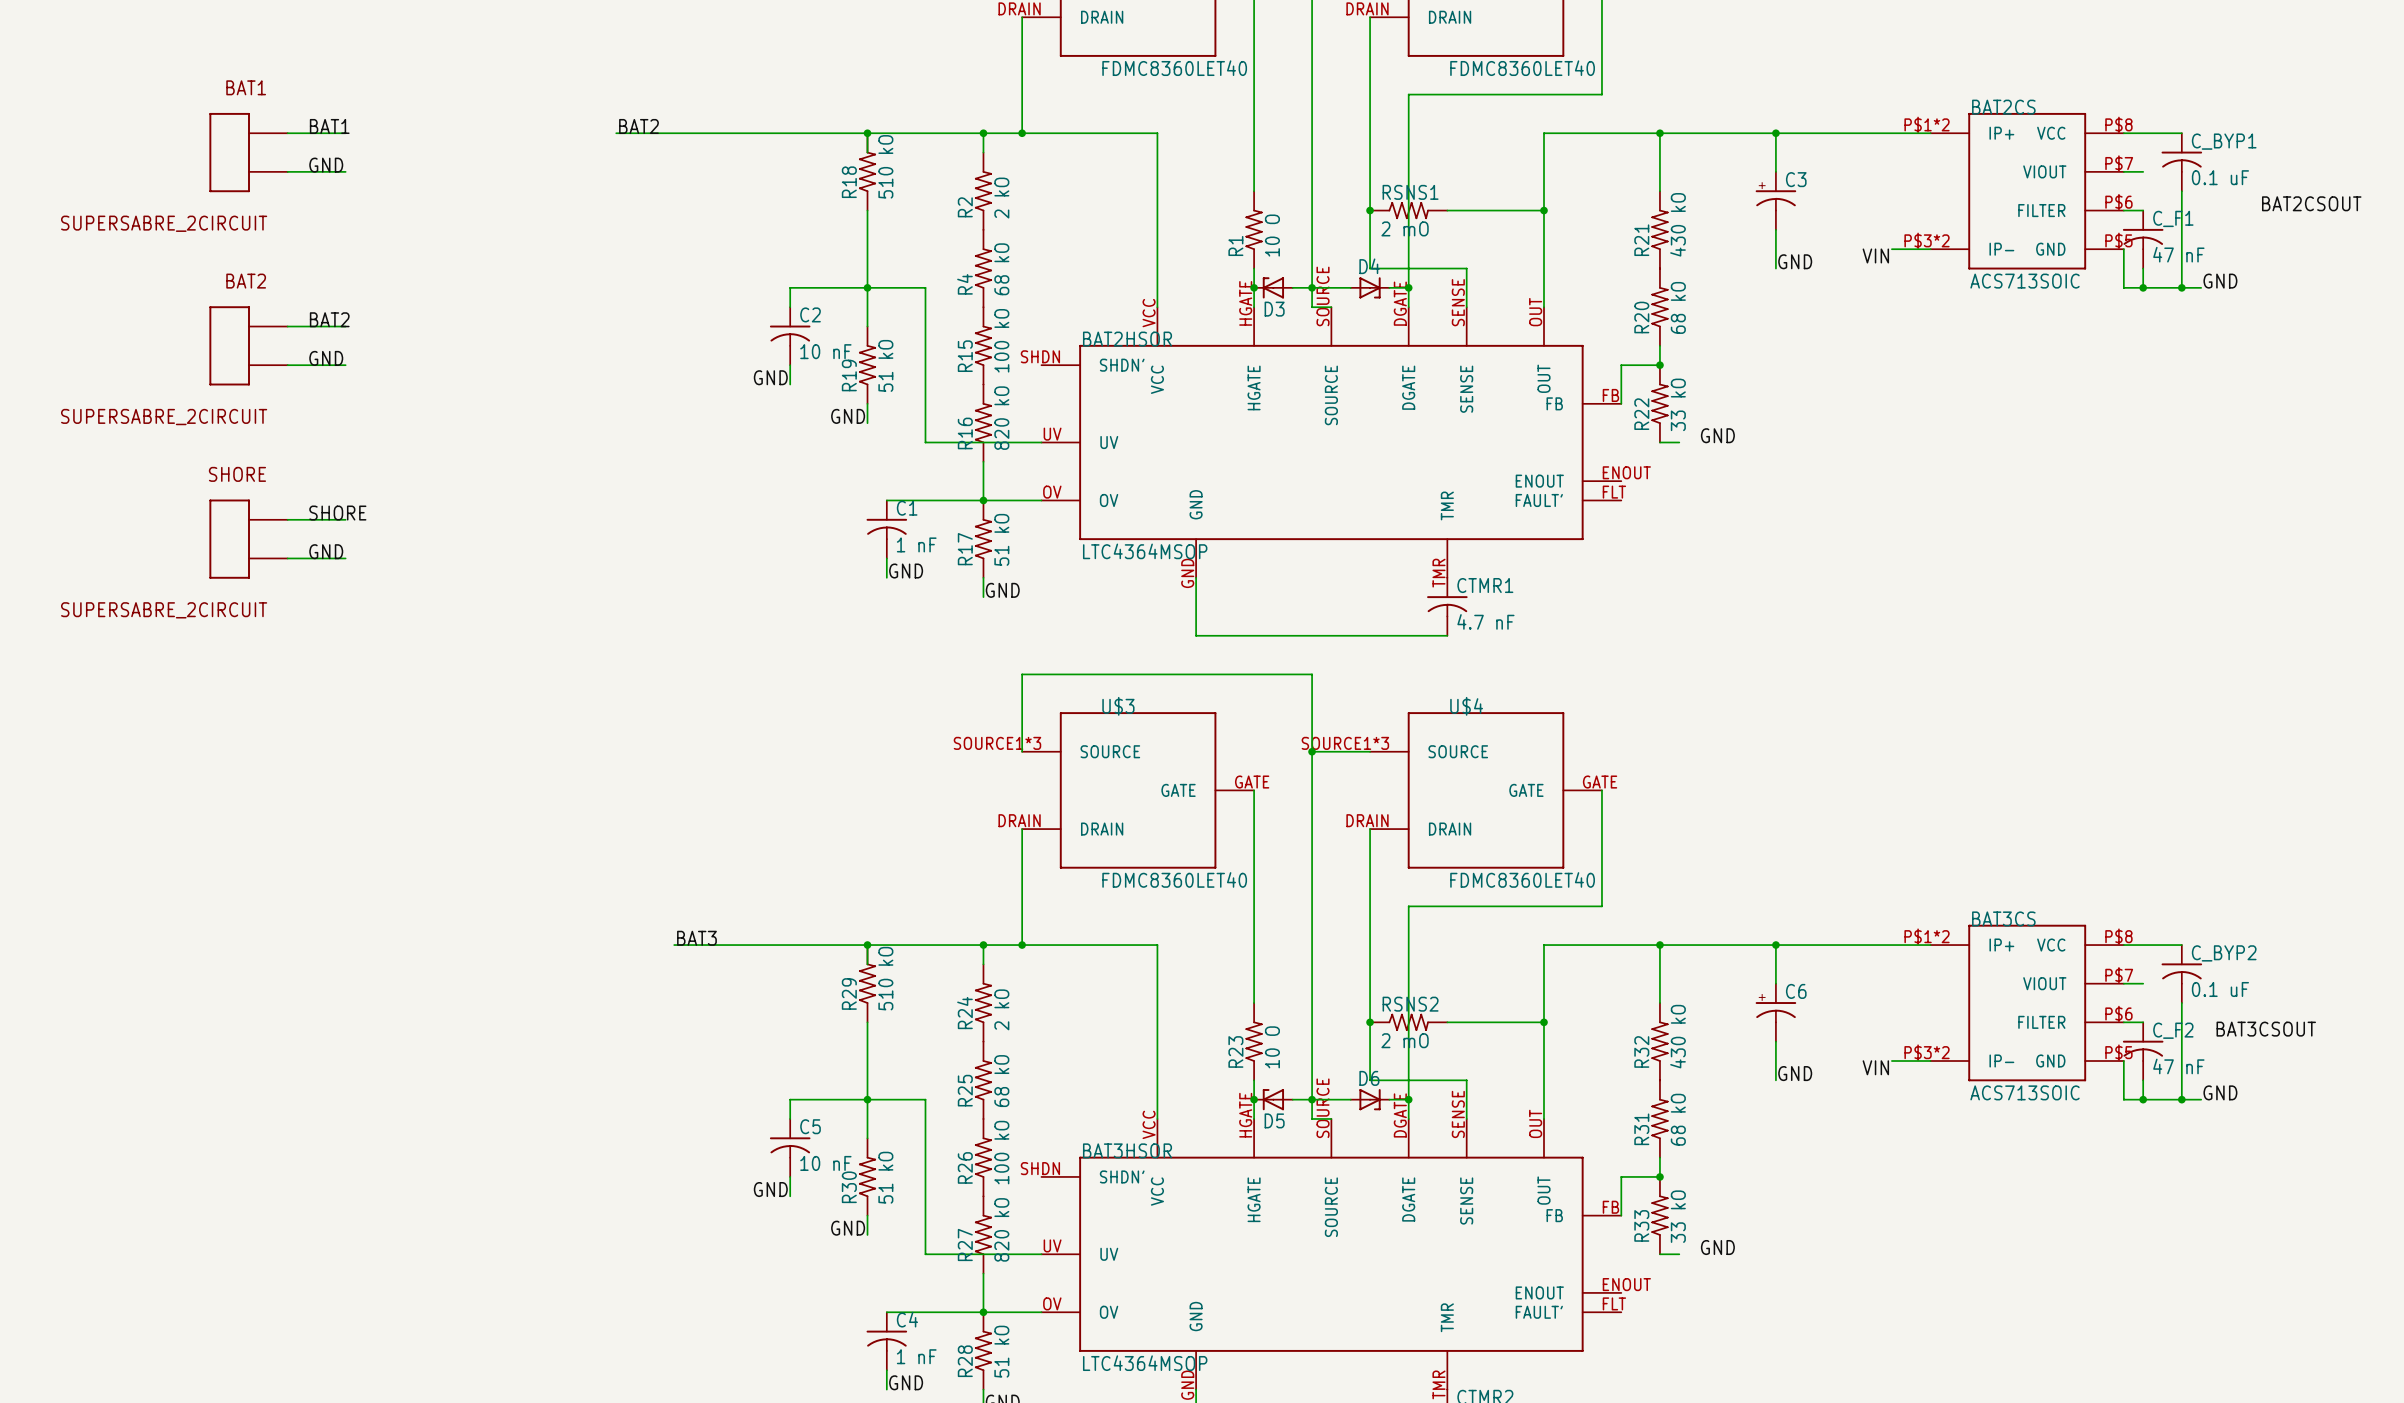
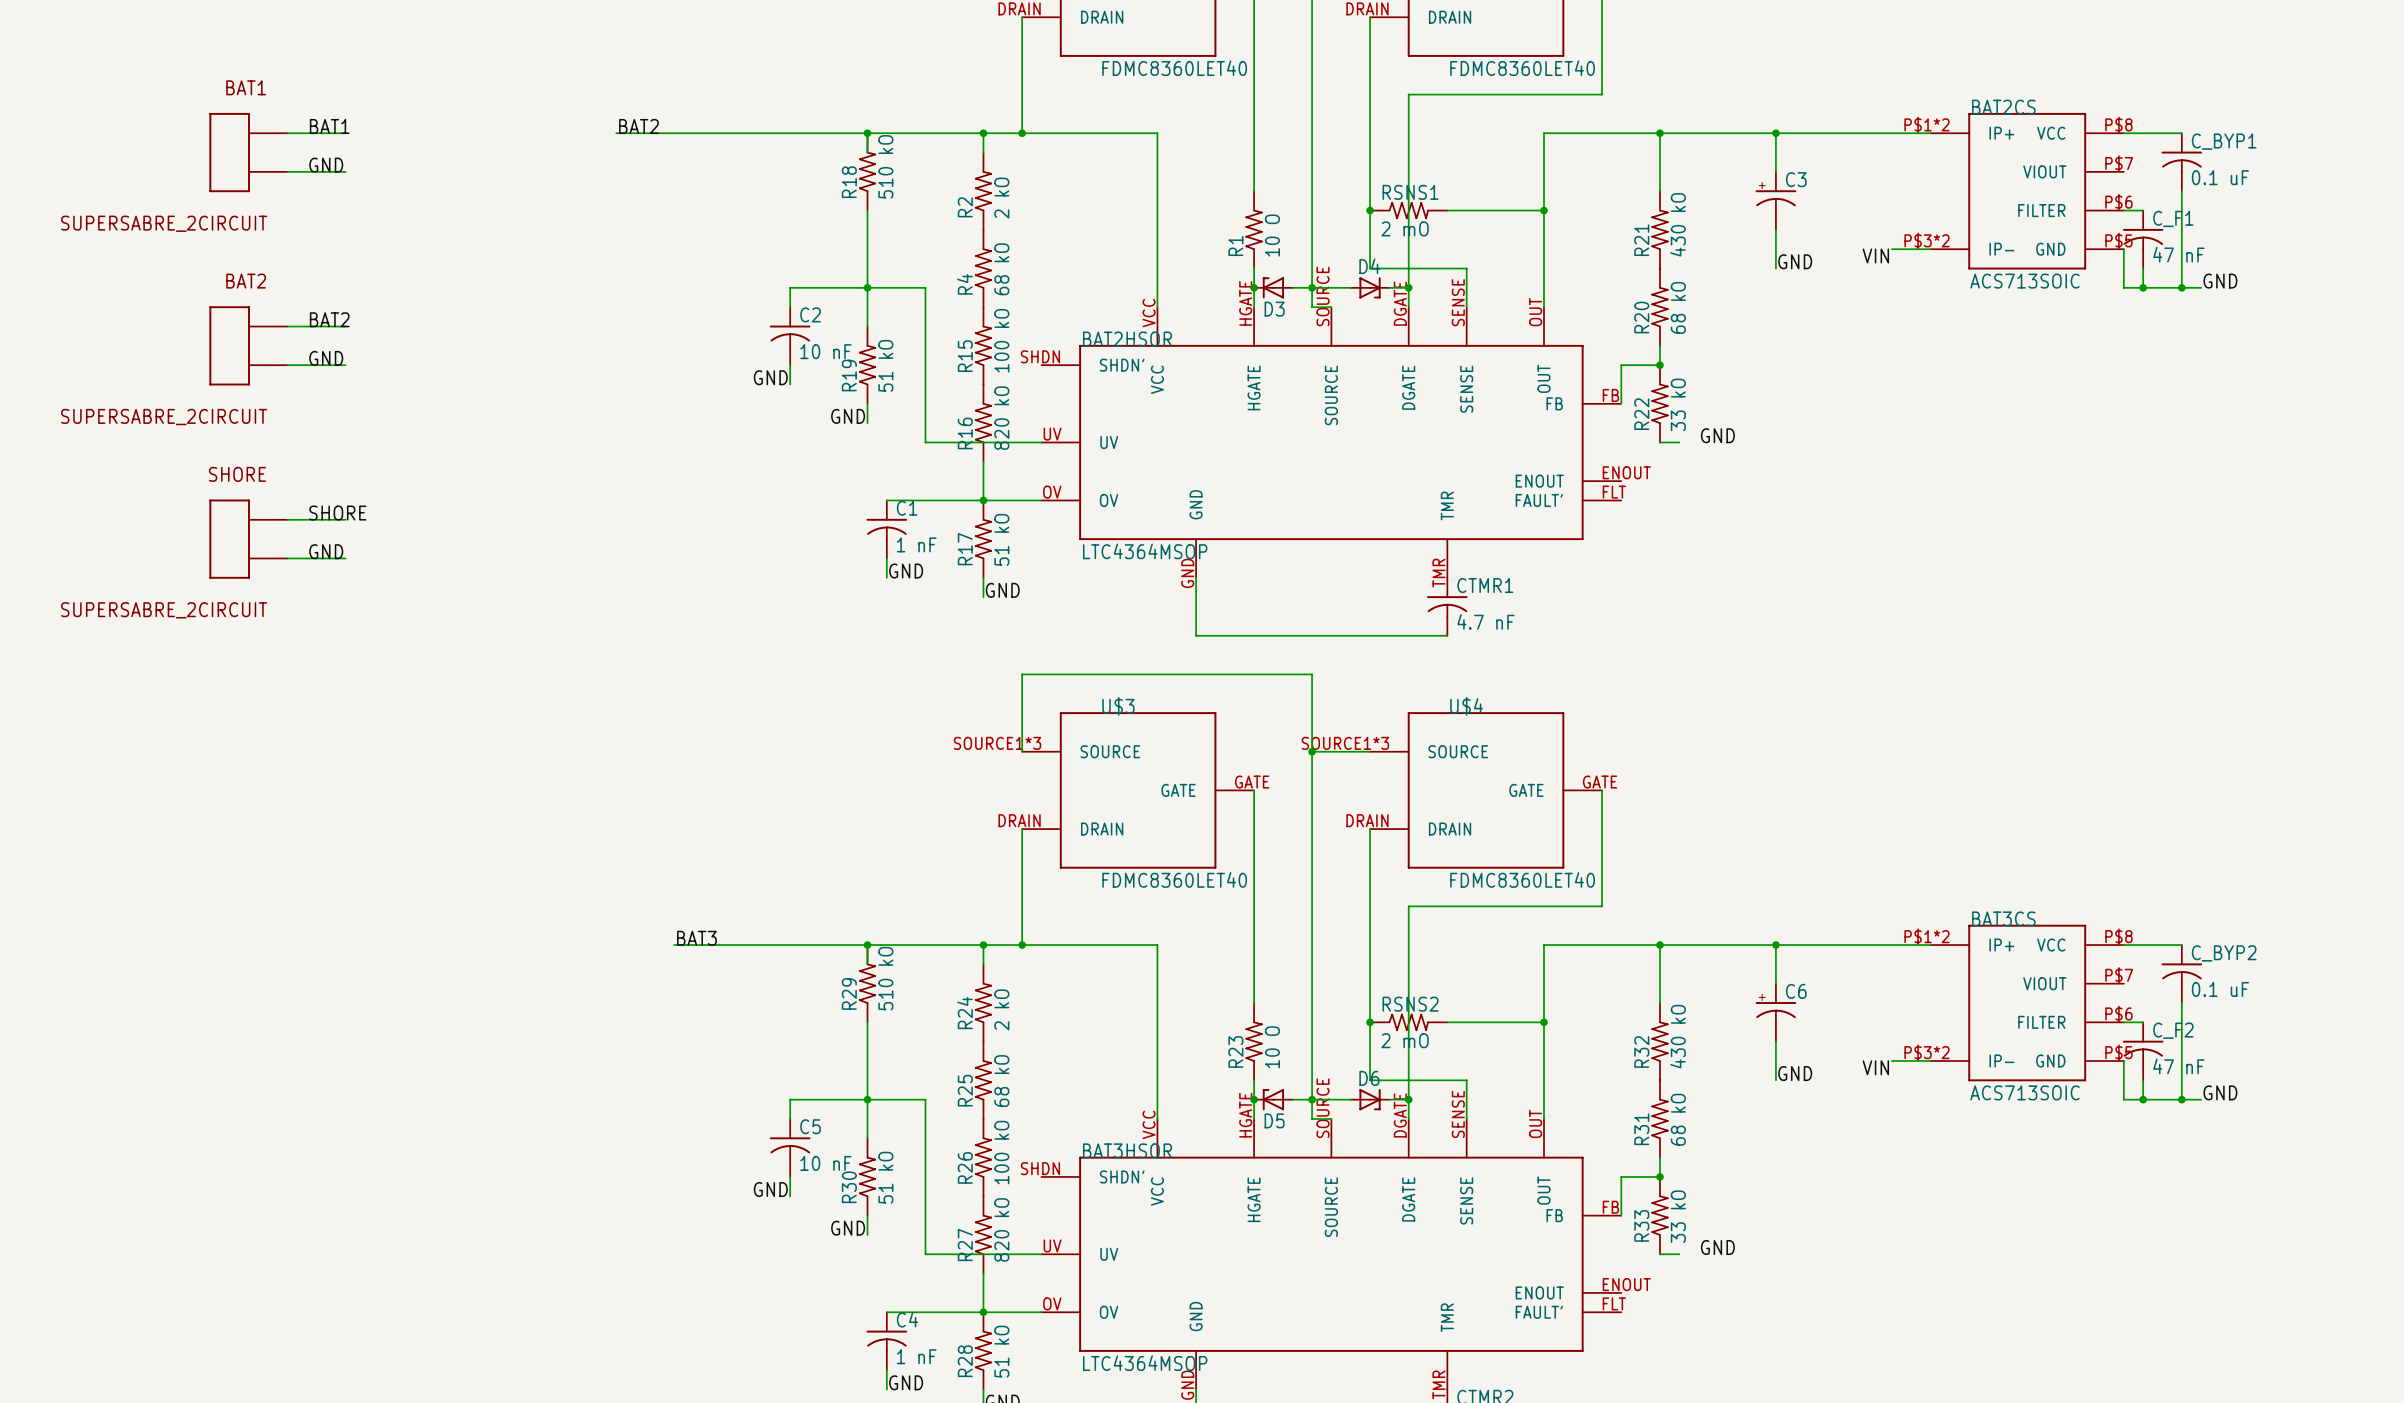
wire: (2123, 171) (2143, 171) -> none
label: BAT2CSOUT (2311, 203) -> none
wire: (2123, 983) (2143, 983) -> none
label: BAT3CSOUT (2266, 1029) -> none

